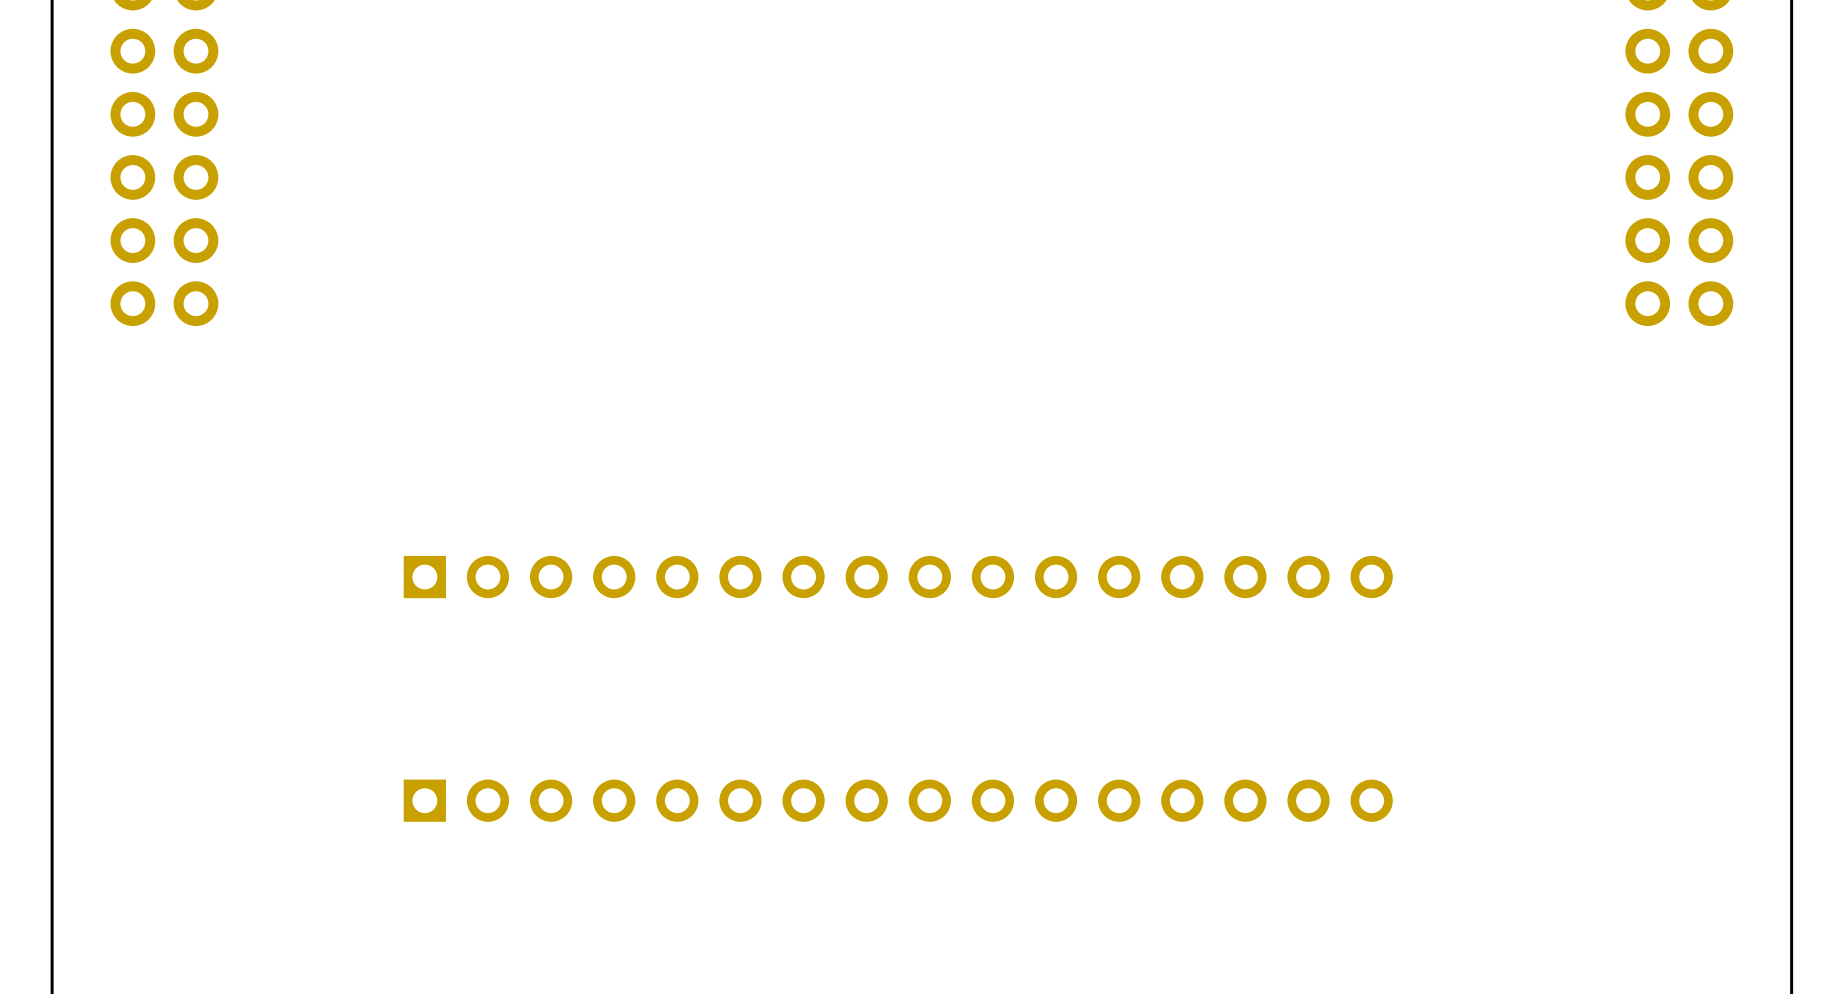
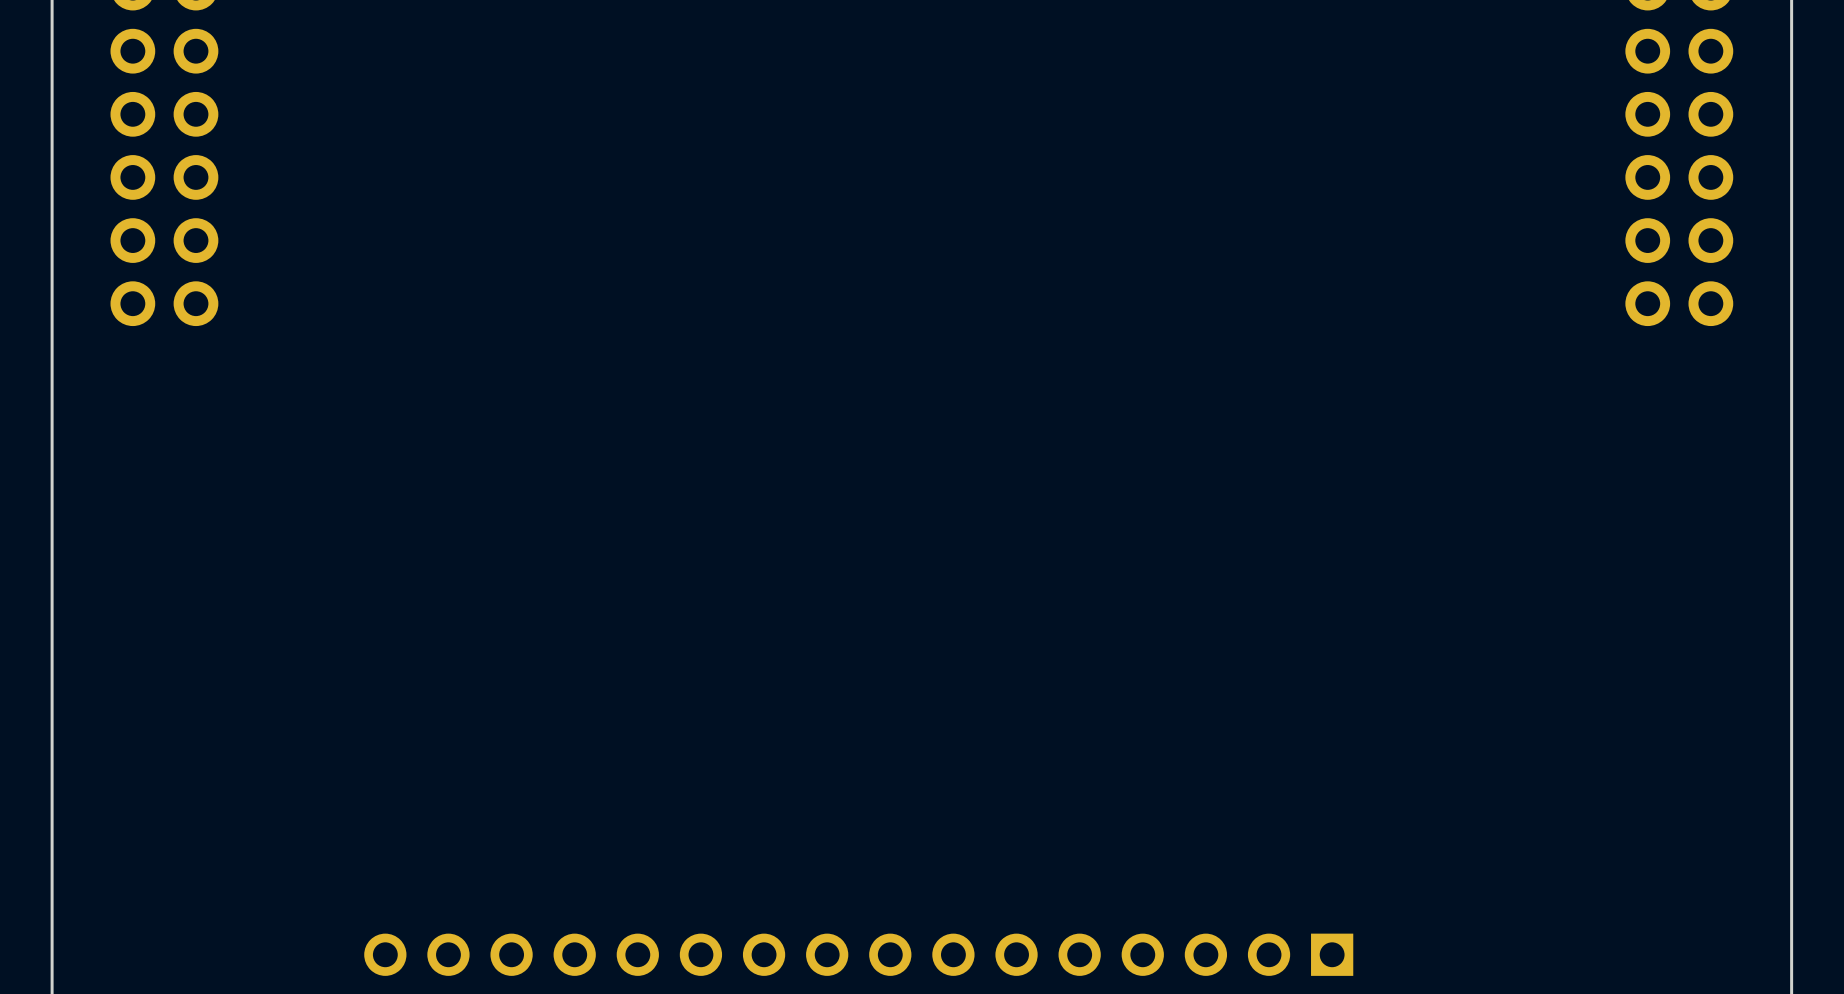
part: (898, 577) -> none
part rotation: 0° (898, 800) -> 180° (858, 954)

